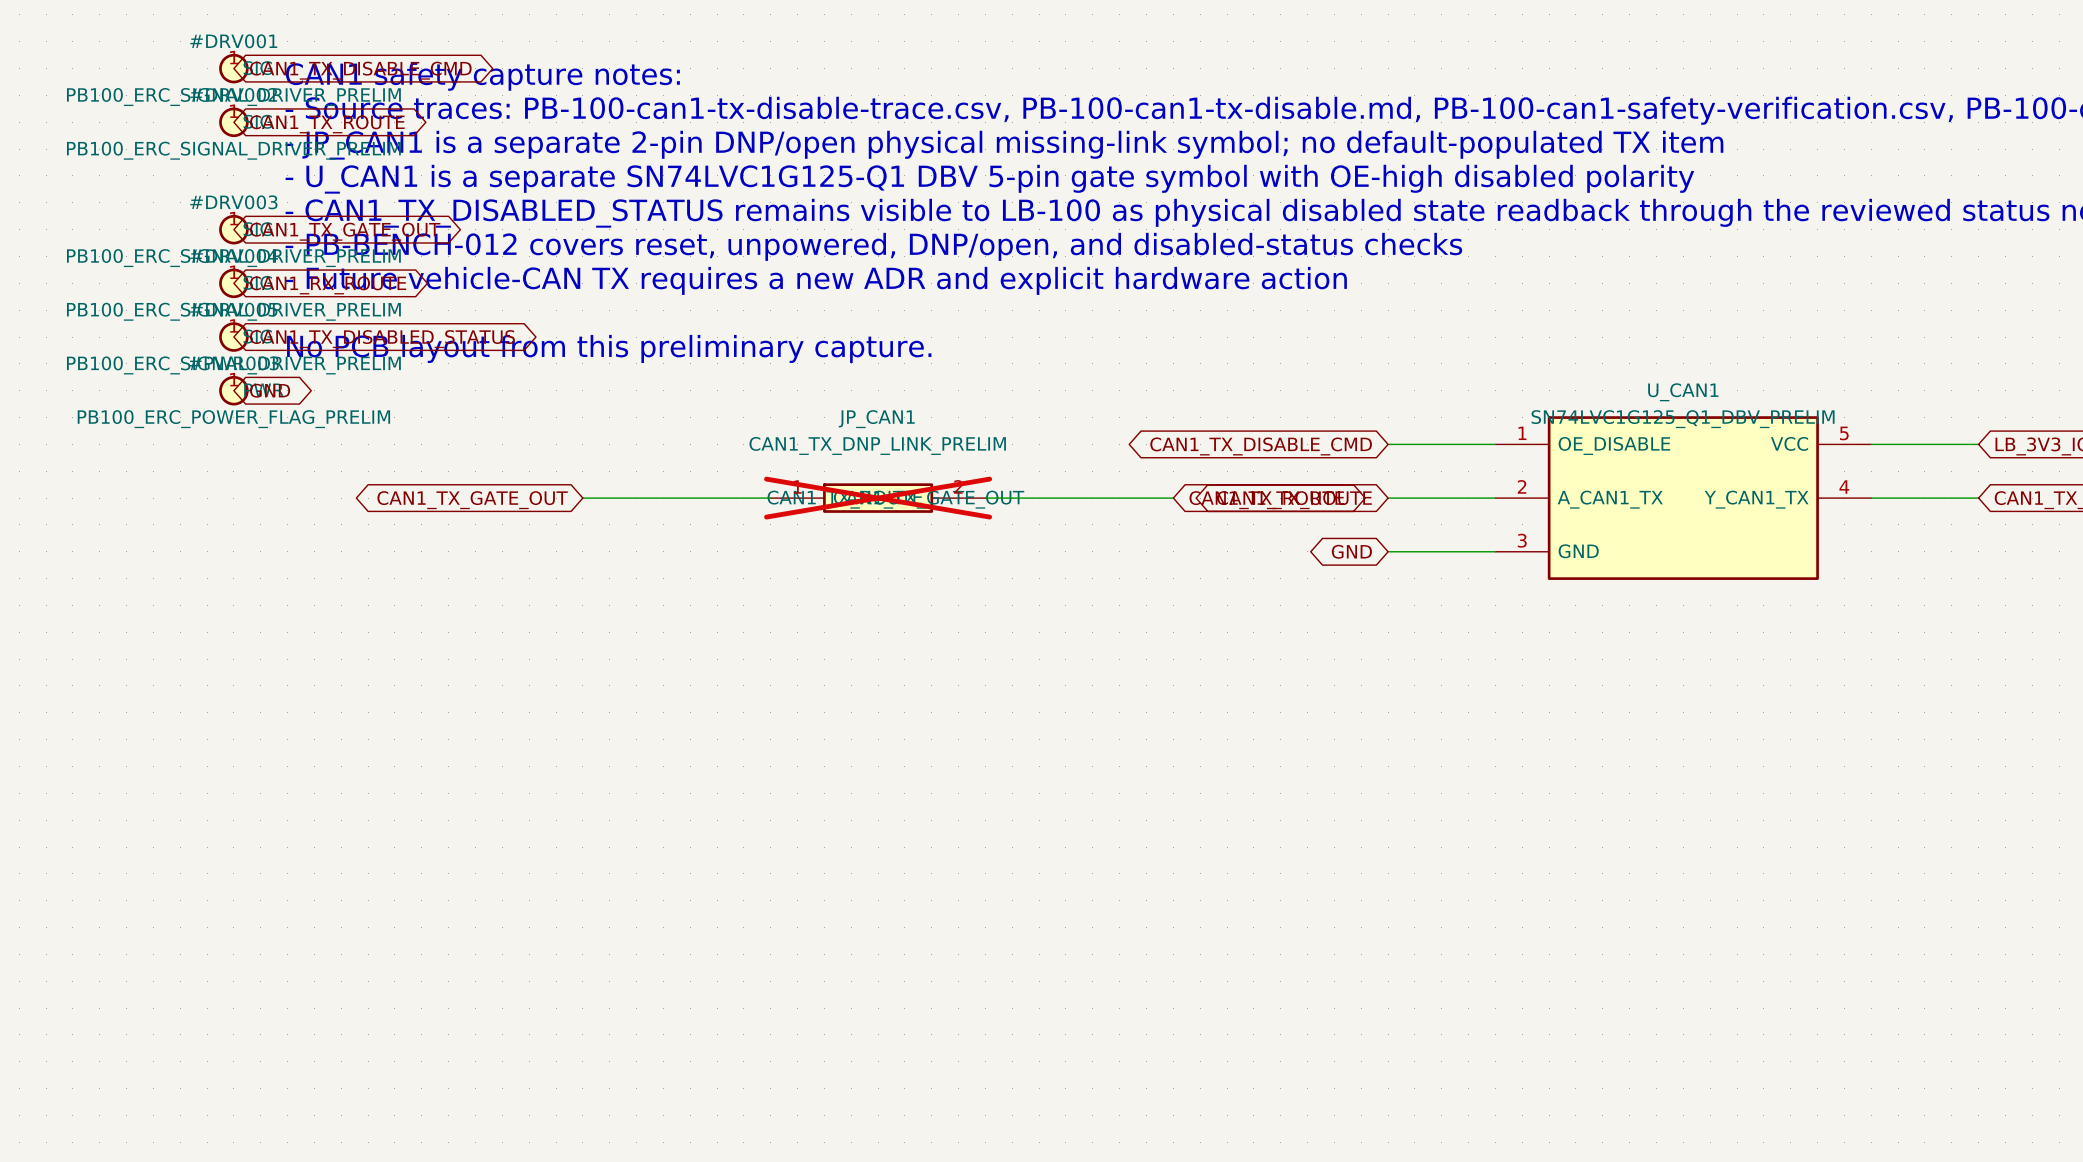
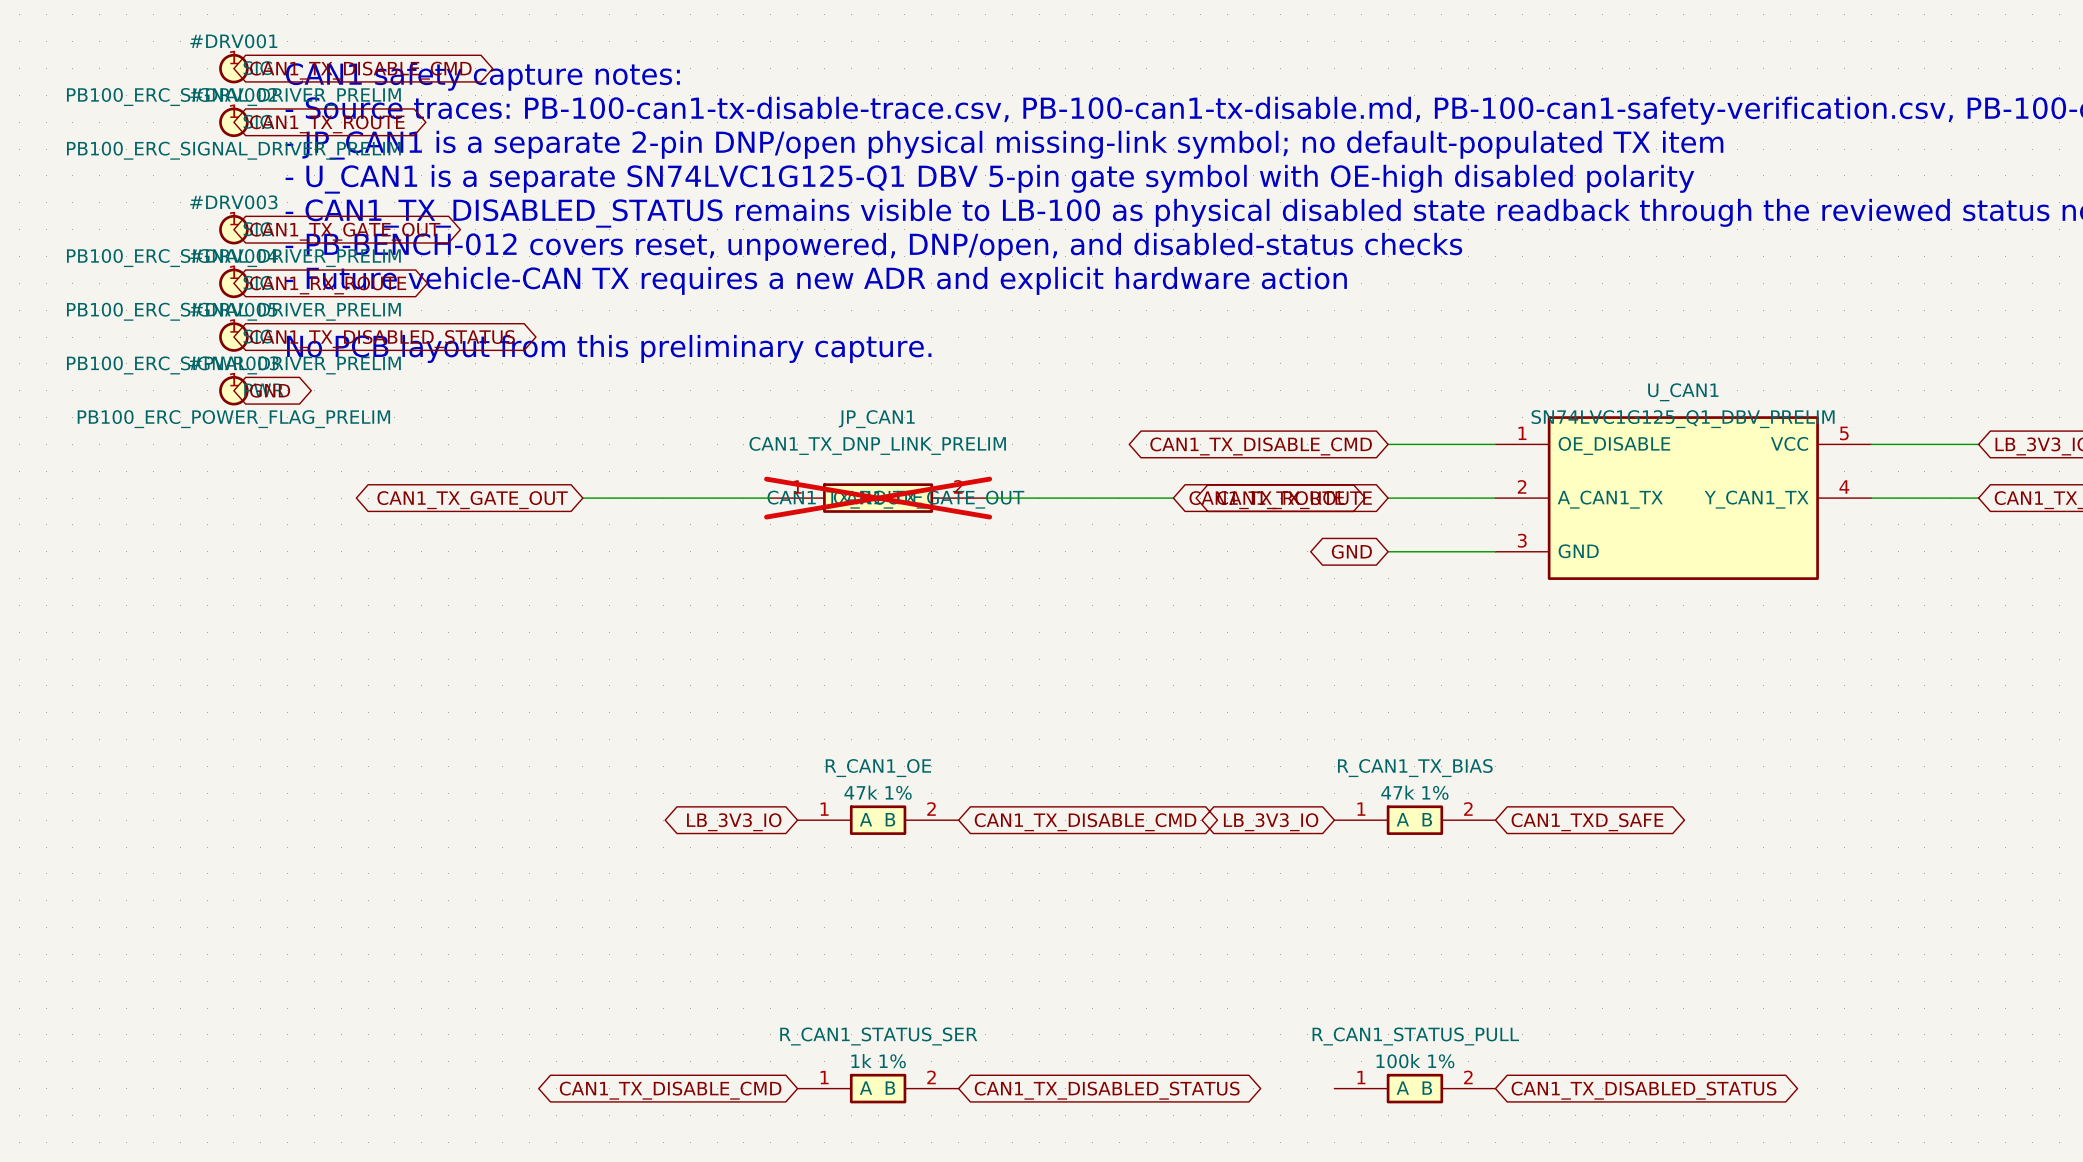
R_CAN1_OE: none -> 47k 1% (878, 820)
R_CAN1_TX_BIAS: none -> 47k 1% (1414, 820)
global label: none -> LB_3V3_IO (734, 822)
global label: none -> CAN1_TX_DISABLE_CMD (1085, 822)
global label: none -> LB_3V3_IO (1271, 822)
global label: none -> CAN1_TXD_SAFE (1587, 822)
R_CAN1_STATUS_SER: none -> 1k 1% (878, 1088)
R_CAN1_STATUS_PULL: none -> 100k 1% (1414, 1088)
global label: none -> CAN1_TX_DISABLE_CMD (670, 1090)
global label: none -> CAN1_TX_DISABLED_STATUS (1107, 1090)
global label: none -> CAN1_TX_DISABLED_STATUS (1644, 1090)

